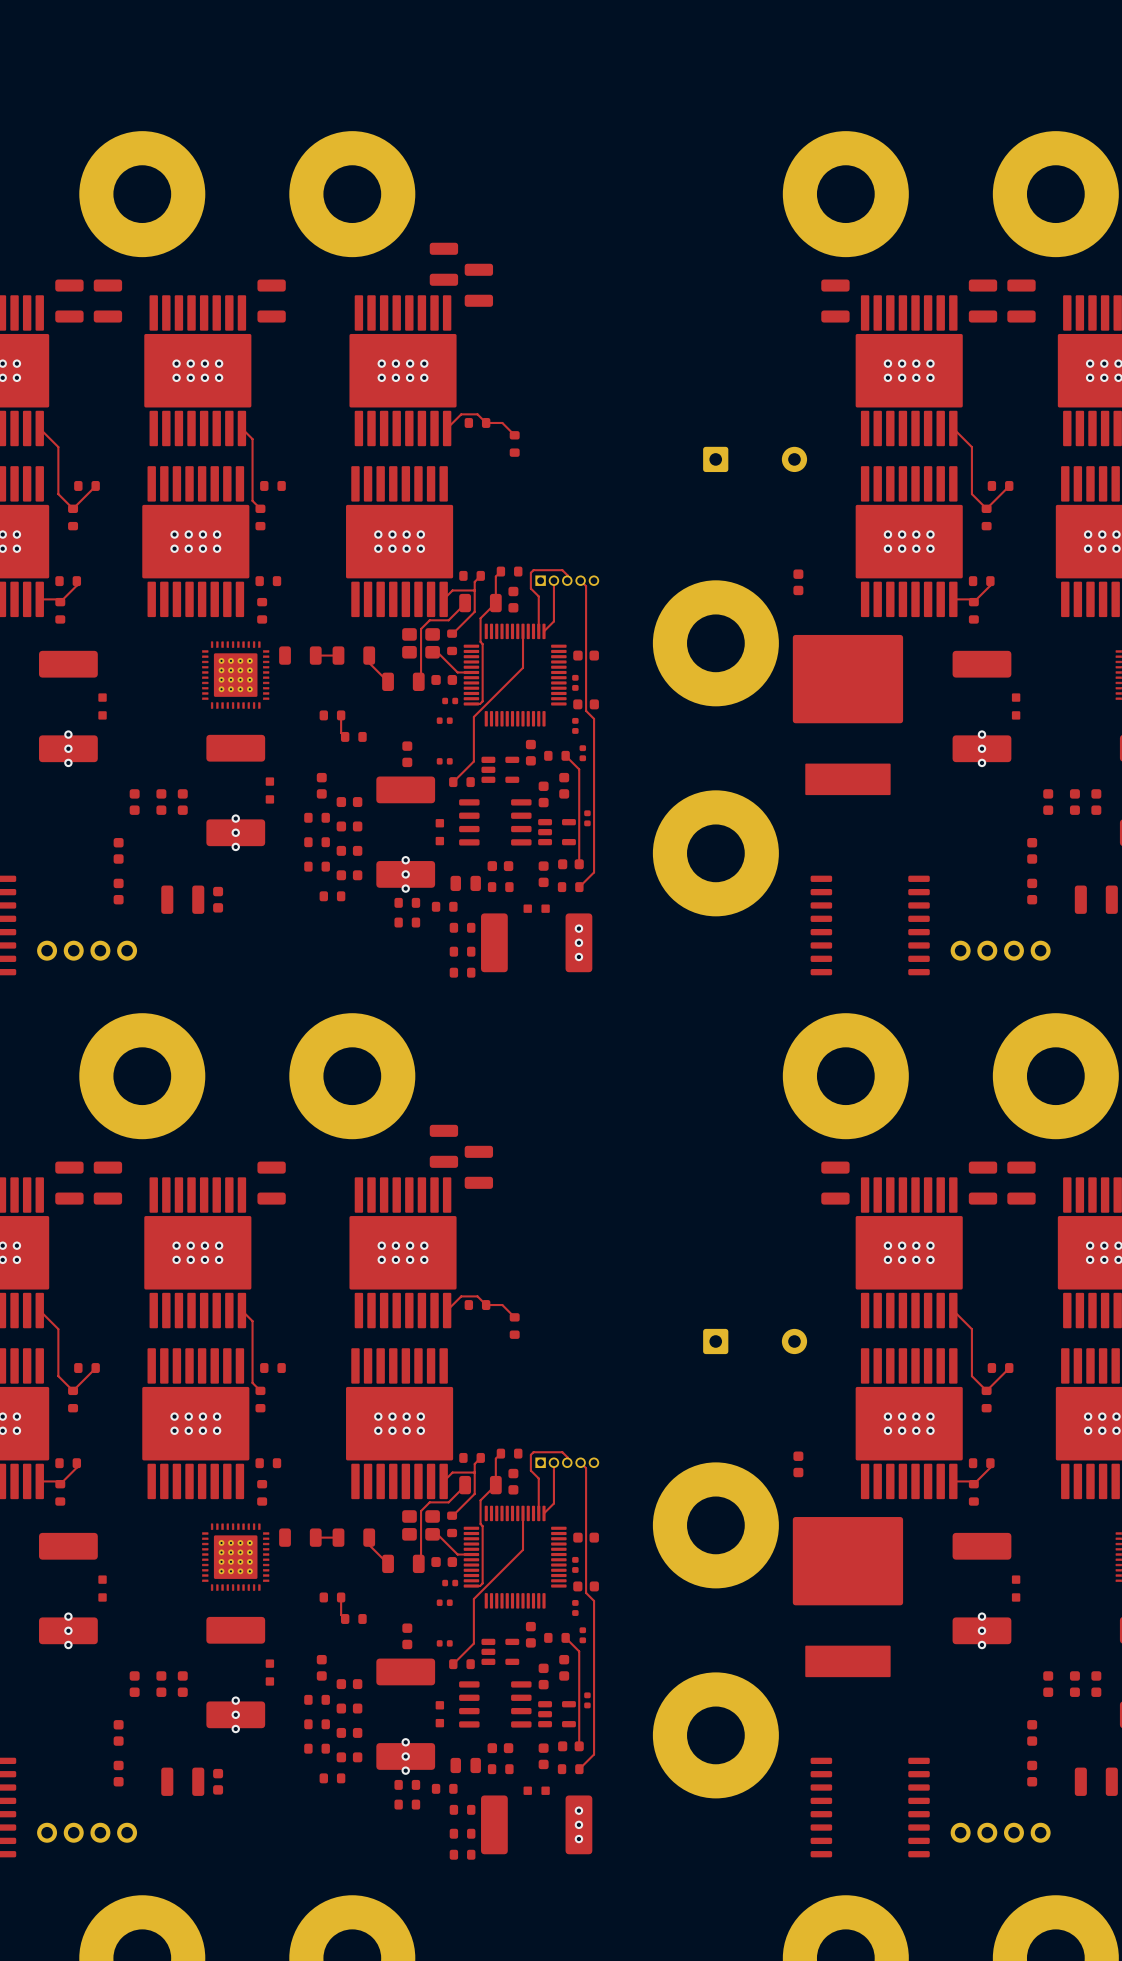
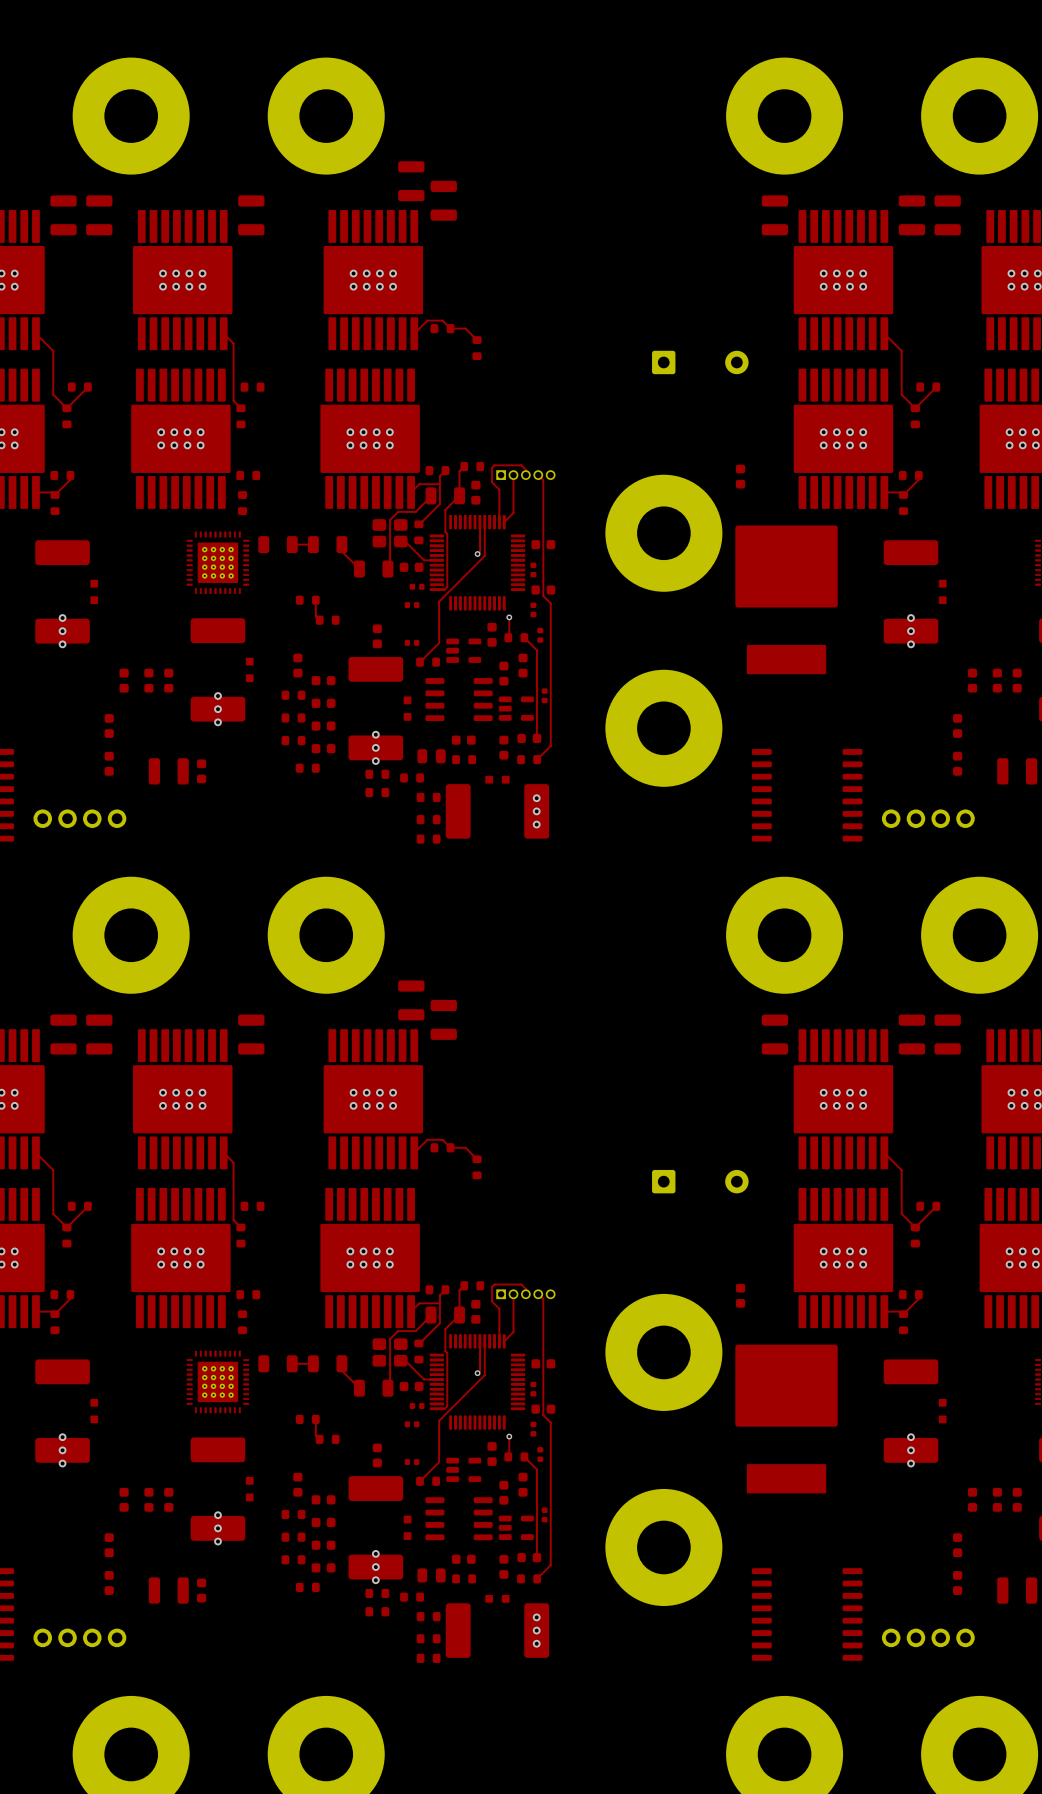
top track: none -> (479, 522) (480, 551) (477, 554)
via: none -> (477, 554)
top track: none -> (509, 617) (508, 637)
via: none -> (509, 617)
top track: none -> (479, 1341) (480, 1370) (477, 1373)
via: none -> (477, 1373)
top track: none -> (509, 1436) (508, 1456)
via: none -> (509, 1436)

